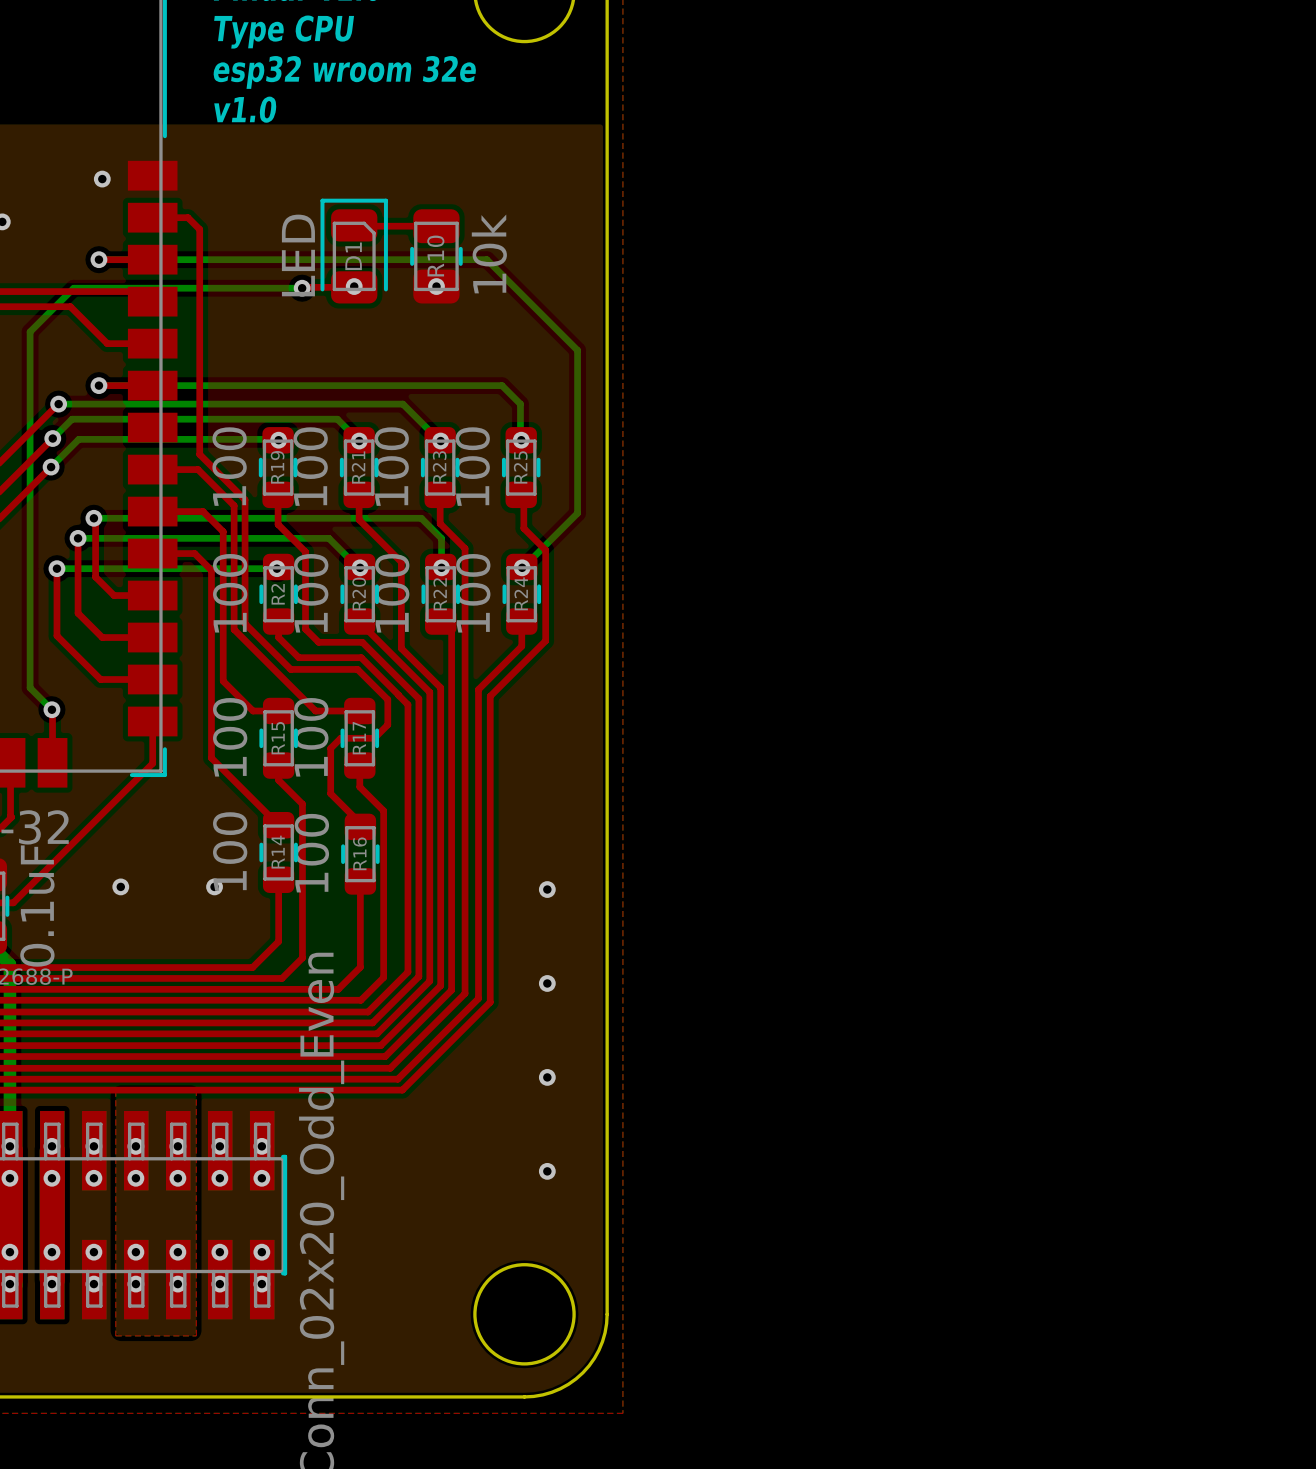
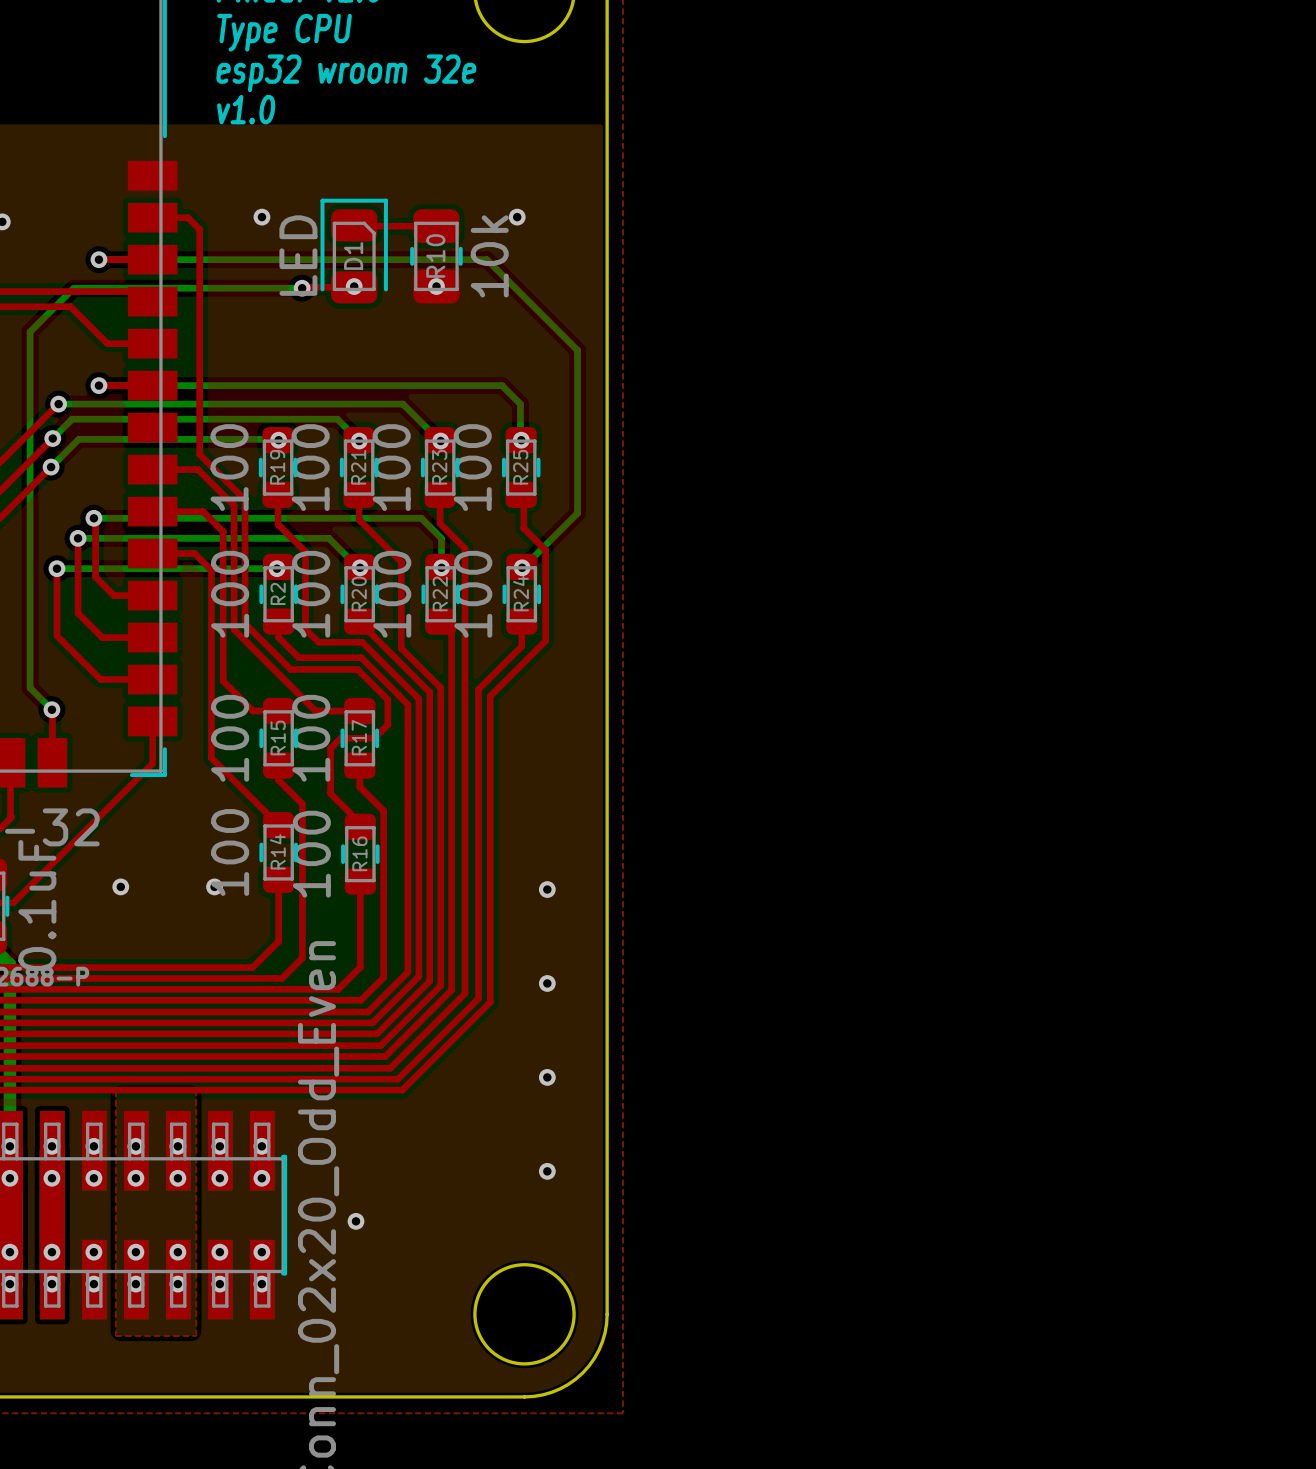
via position: (102, 179) -> (261, 217)
via: none -> (517, 217)
via: none -> (356, 1221)

